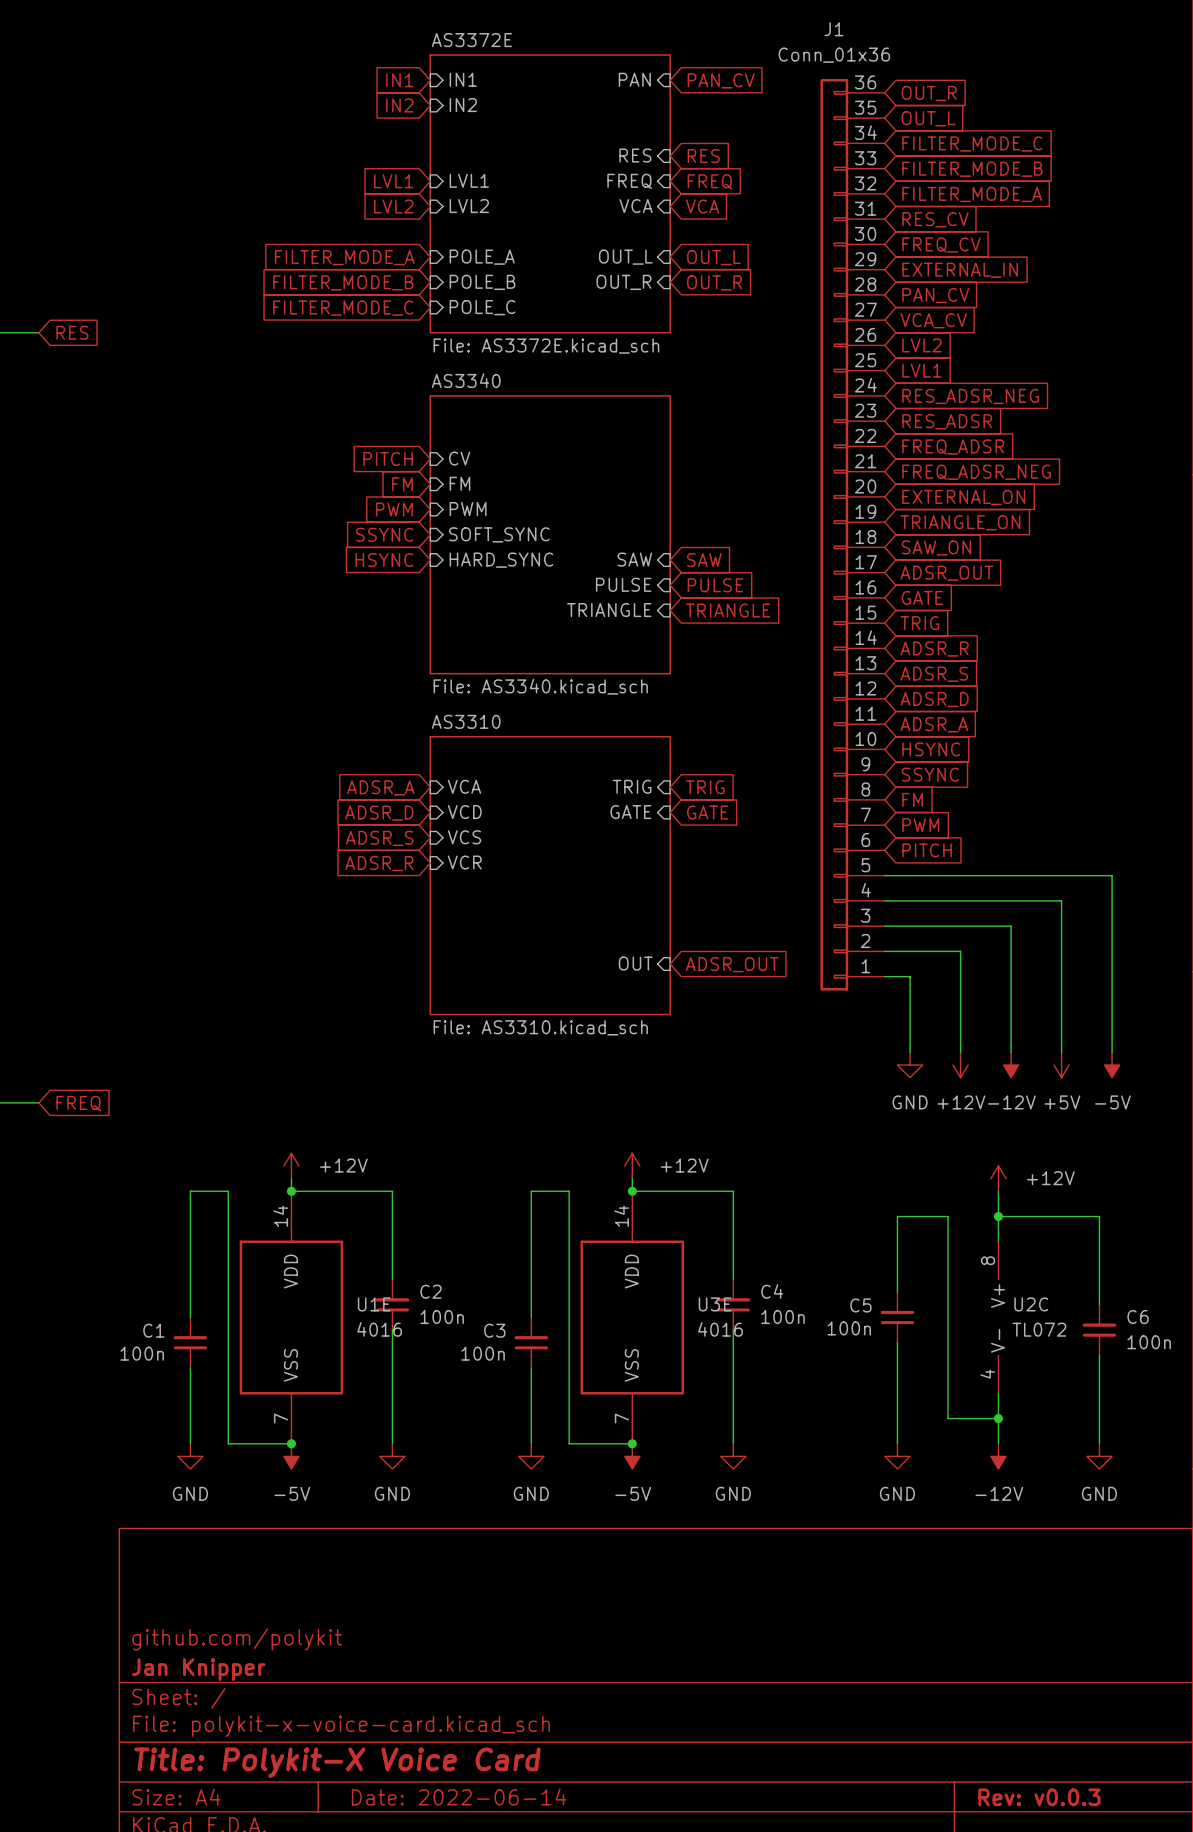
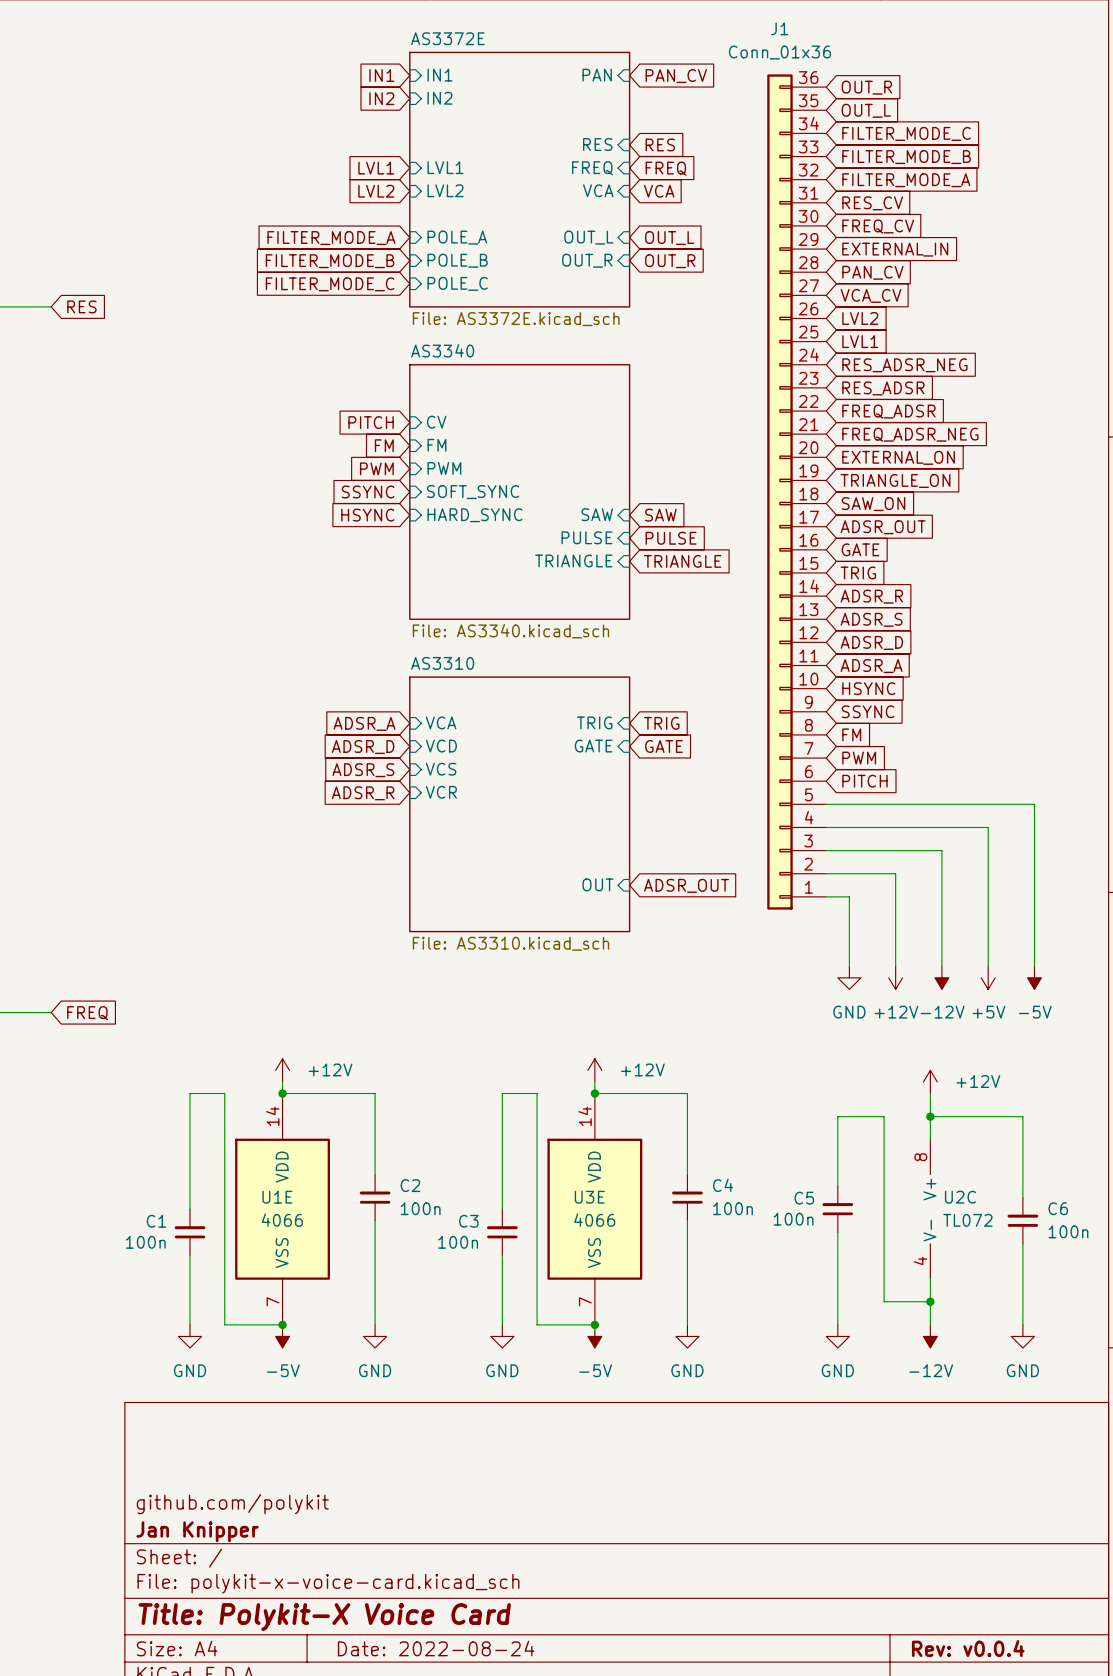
U1E name position: U1E (374, 1304) -> U1E (277, 1197)
U3E name position: U3E (715, 1304) -> U3E (589, 1197)
U1E value: 4016 (379, 1329) -> 4066 (282, 1220)
U3E value: 4016 (720, 1329) -> 4066 (594, 1220)
title block: Date: 2022-06-14 (459, 1796) -> Date: 2022-08-24 (436, 1648)
title block: Rev: v0.0.3 (1039, 1797) -> Rev: v0.0.4 (968, 1648)

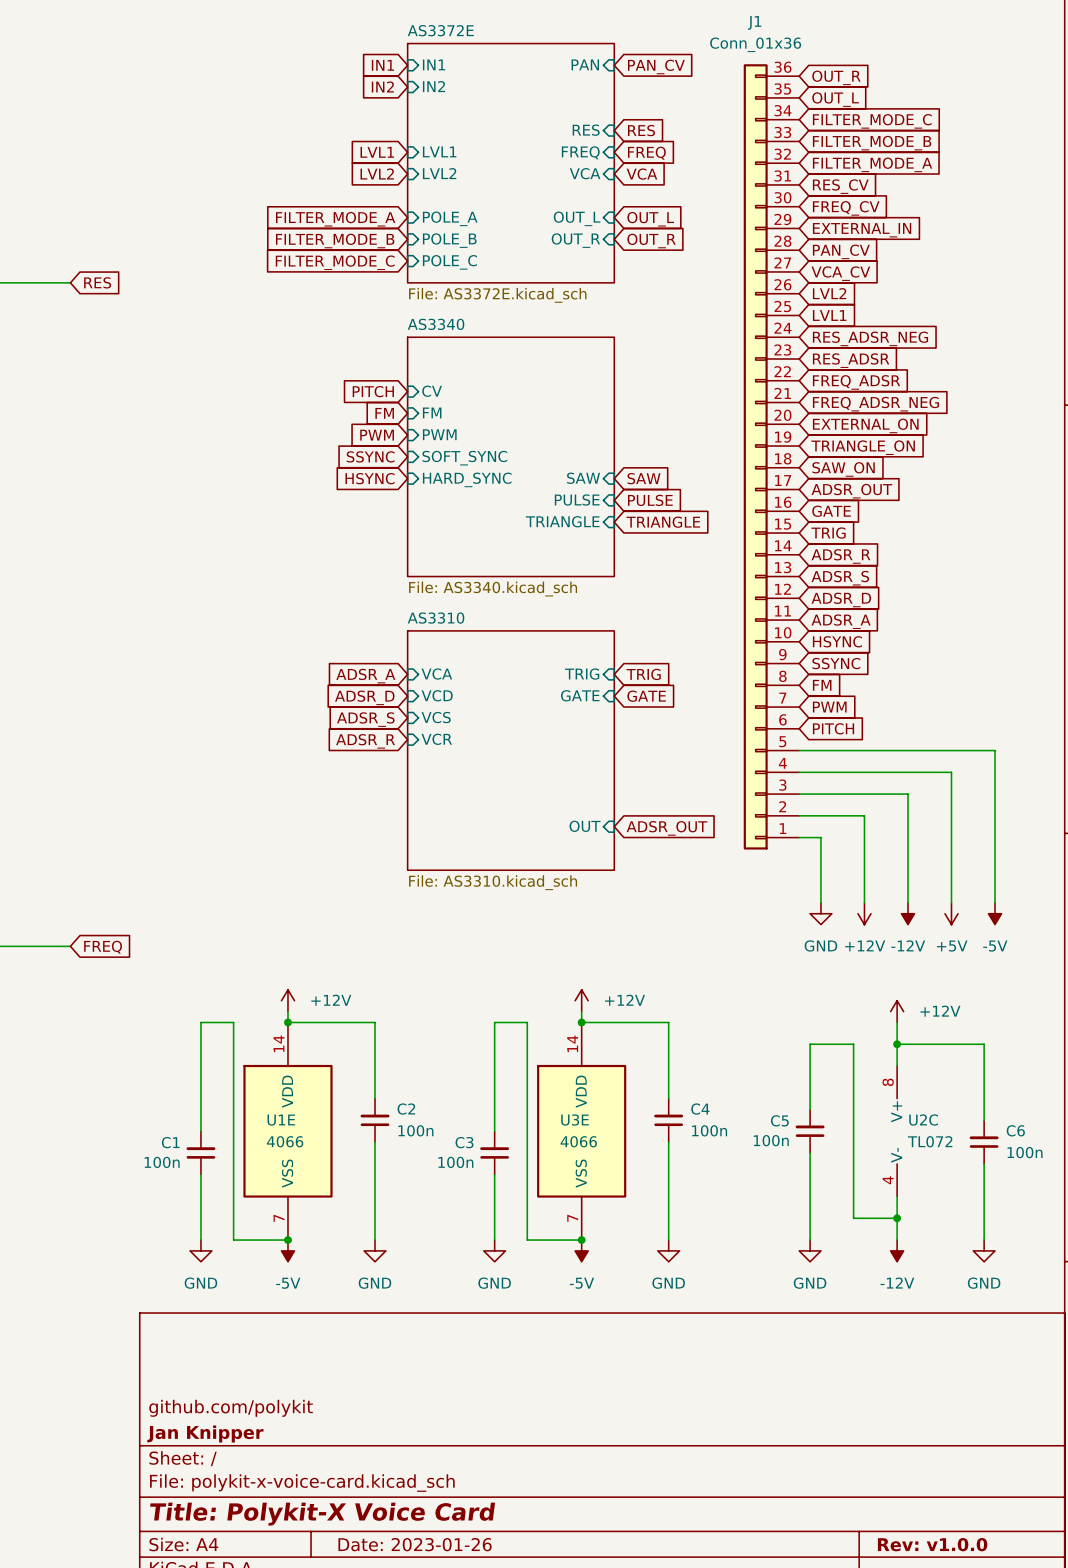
title block: Date: 2022-08-24 (436, 1648) -> Date: 2023-01-26 (415, 1544)
title block: Rev: v0.0.4 (968, 1648) -> Rev: v1.0.0 (932, 1544)

